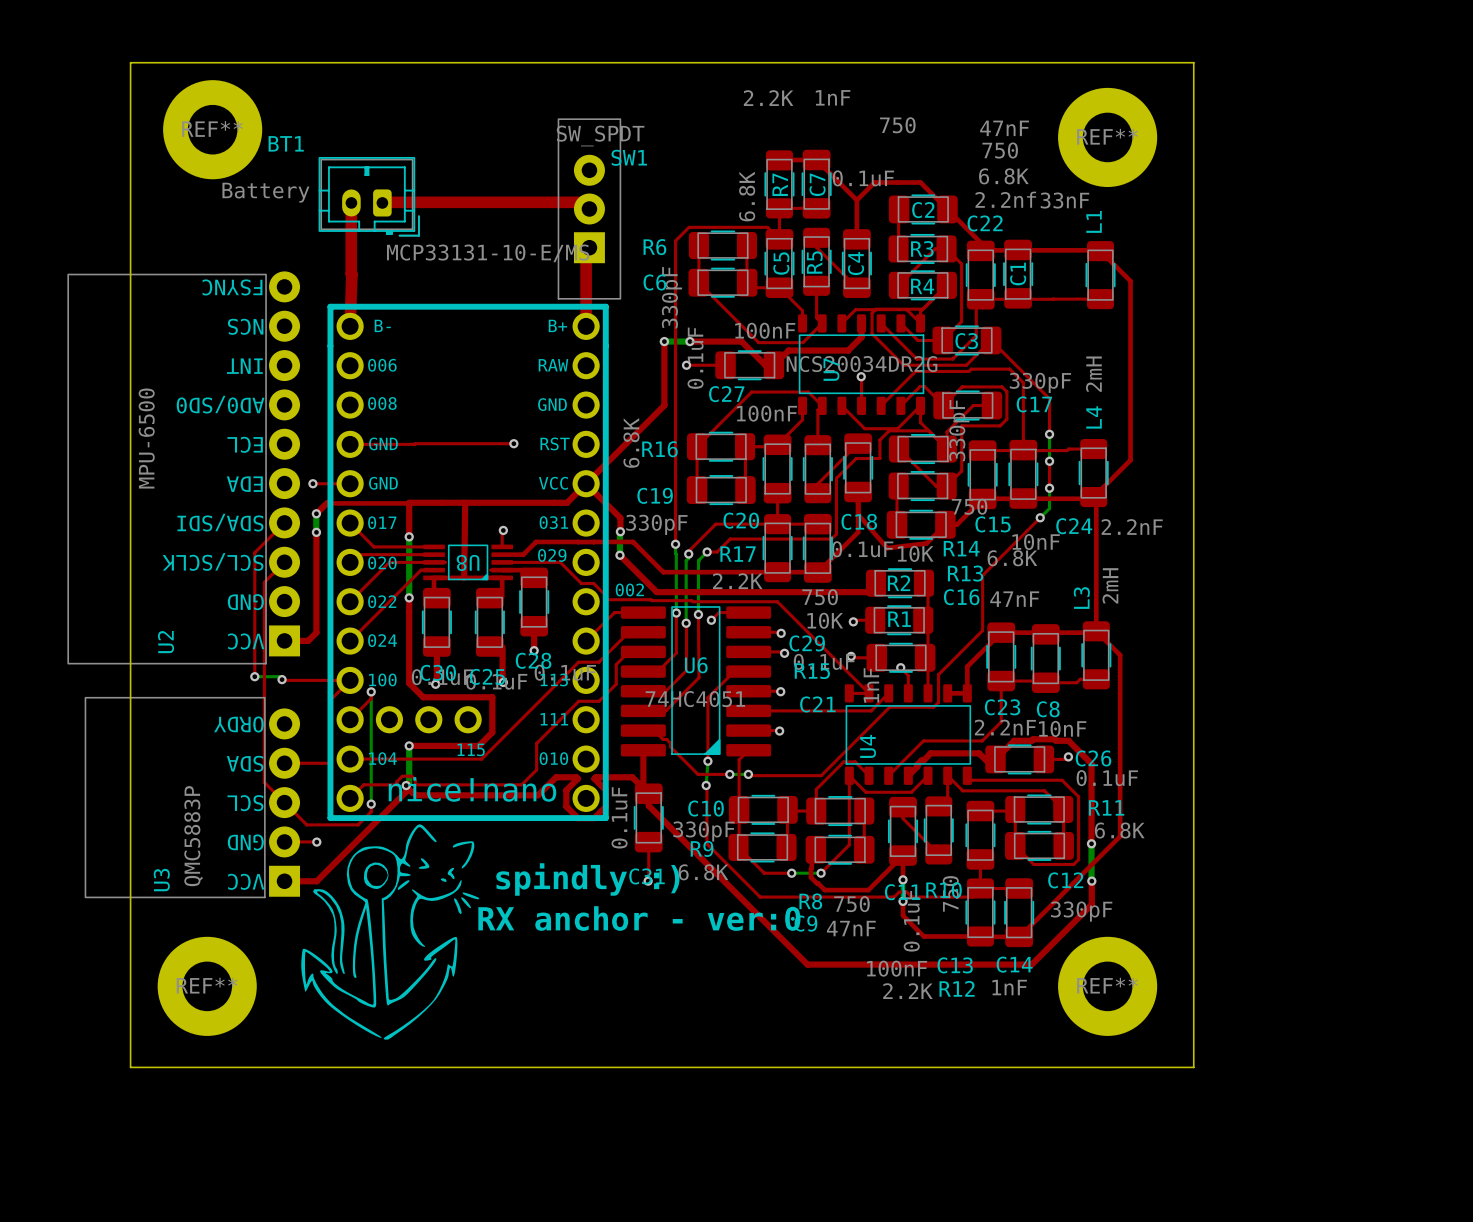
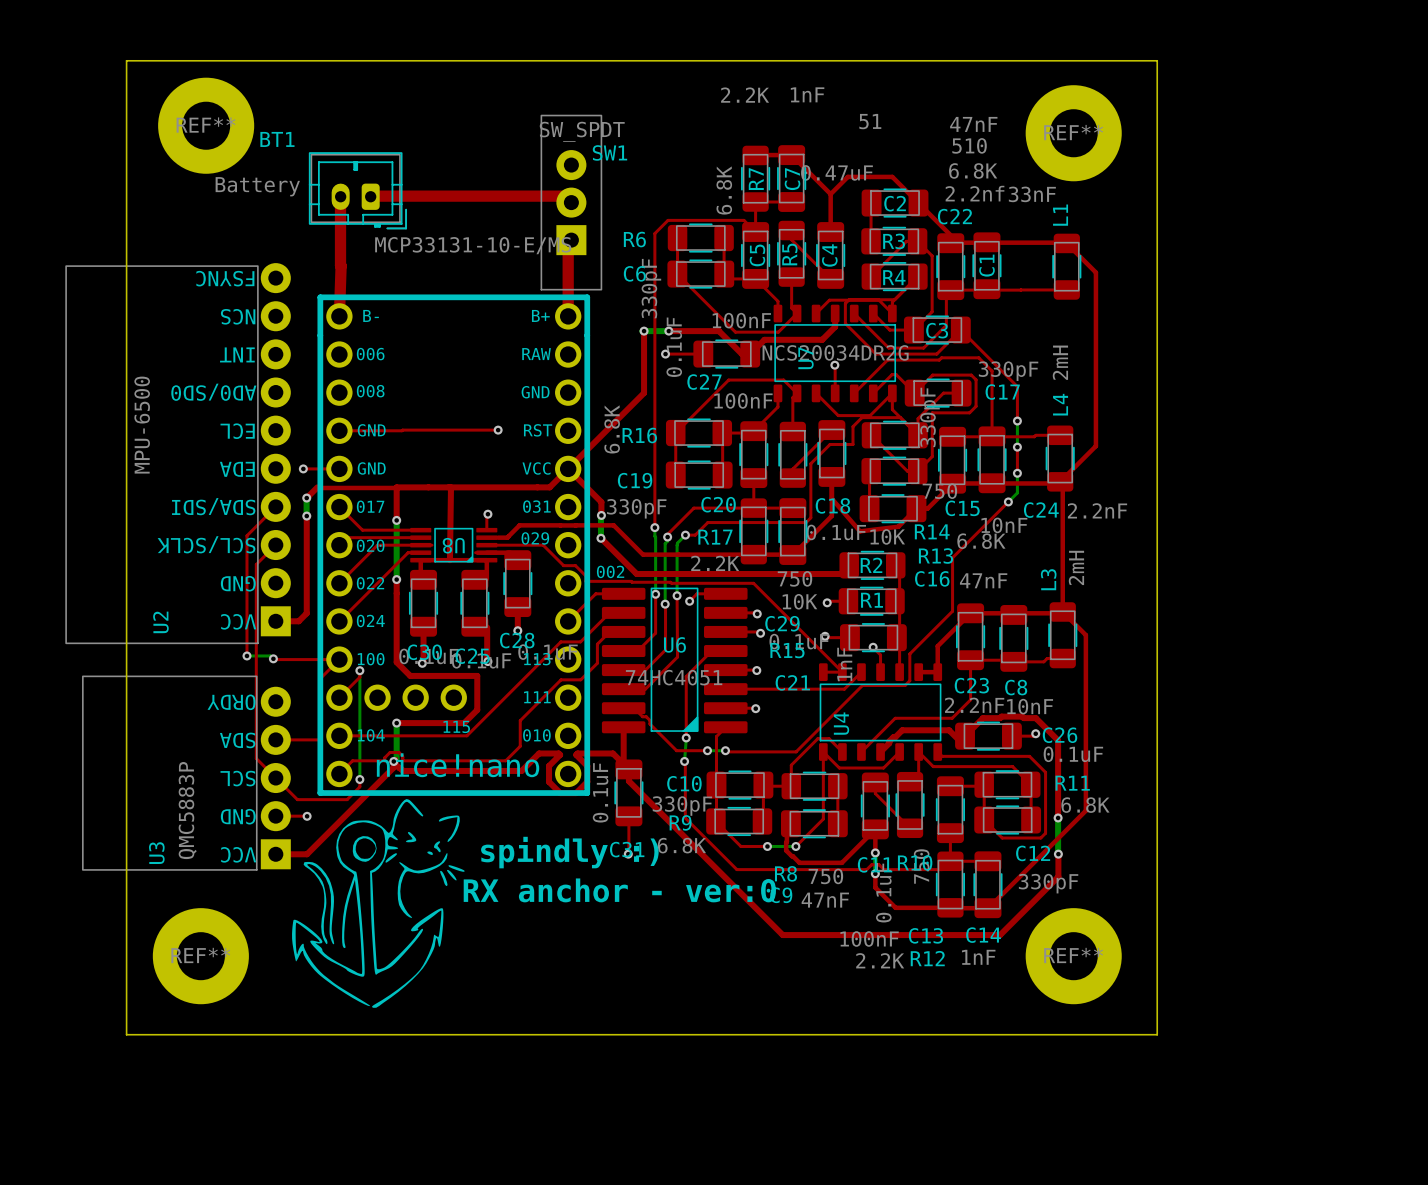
R5 value: 750 (897, 125) -> 51 (870, 121)
R3 value: 750 (1000, 150) -> 510 (969, 145)
C4 value: 0.1uF (863, 178) -> 0.47uF (836, 172)

